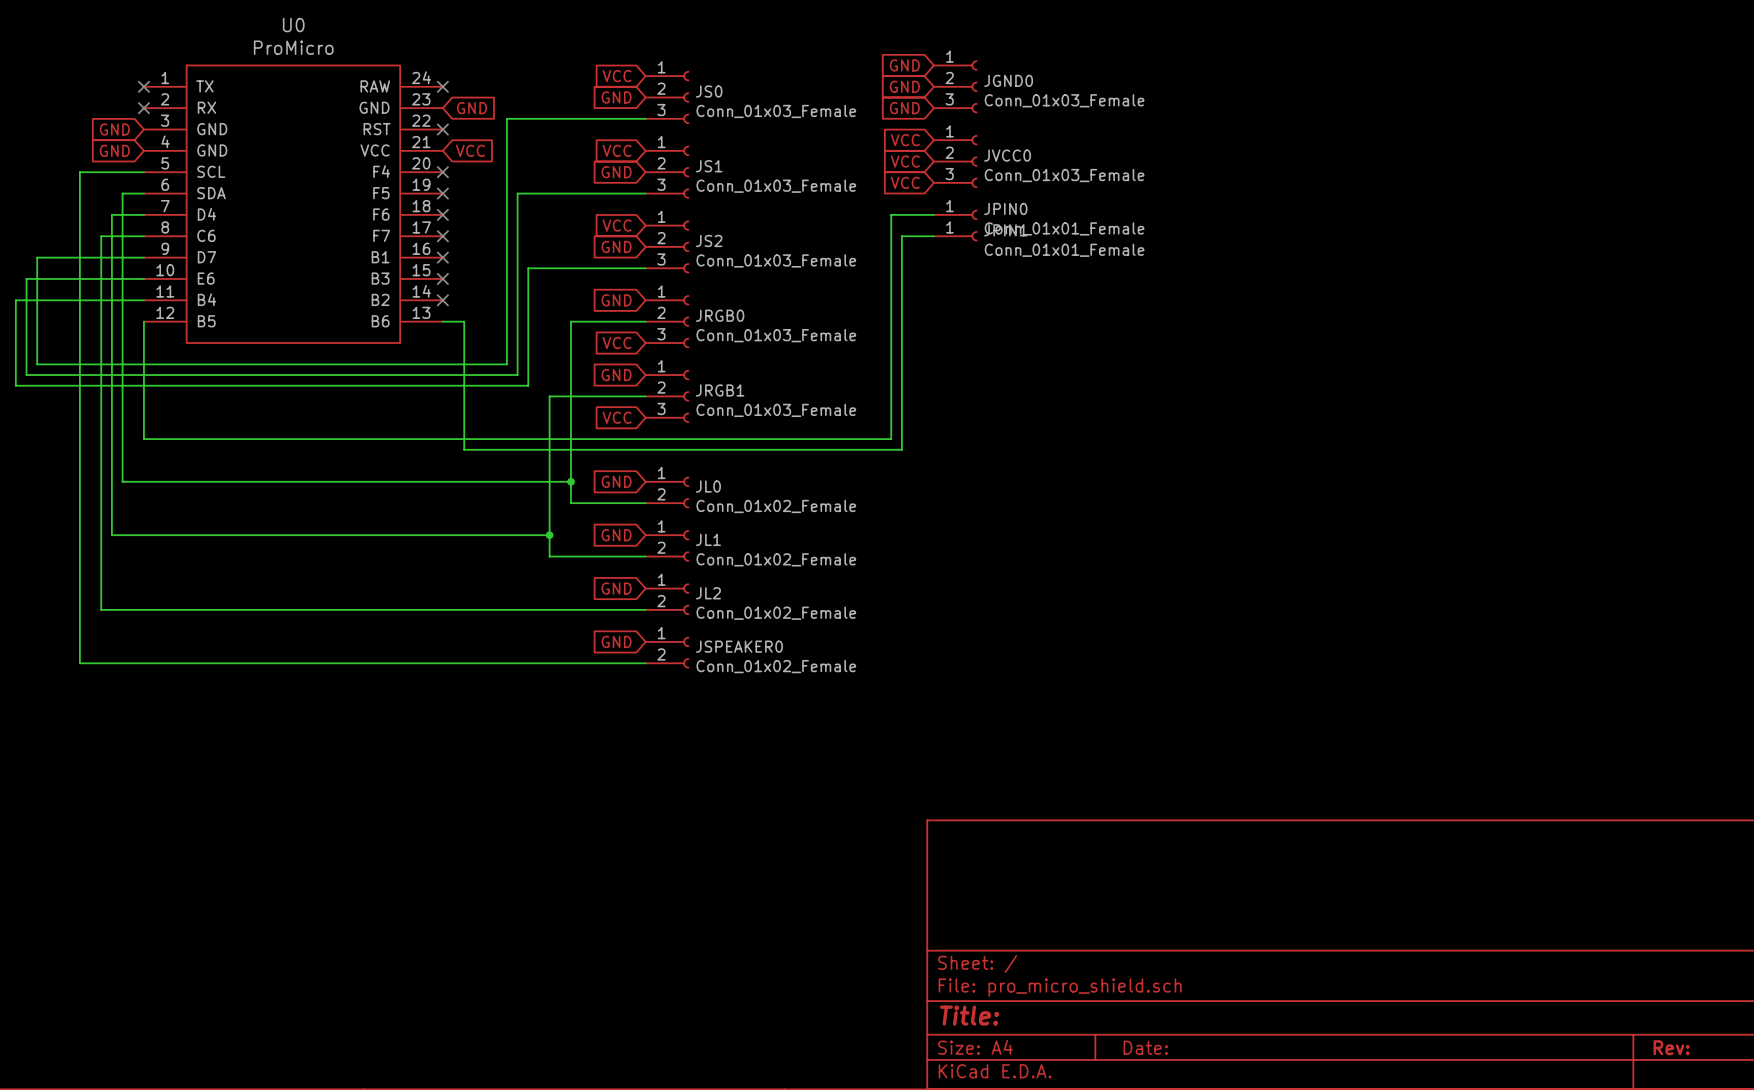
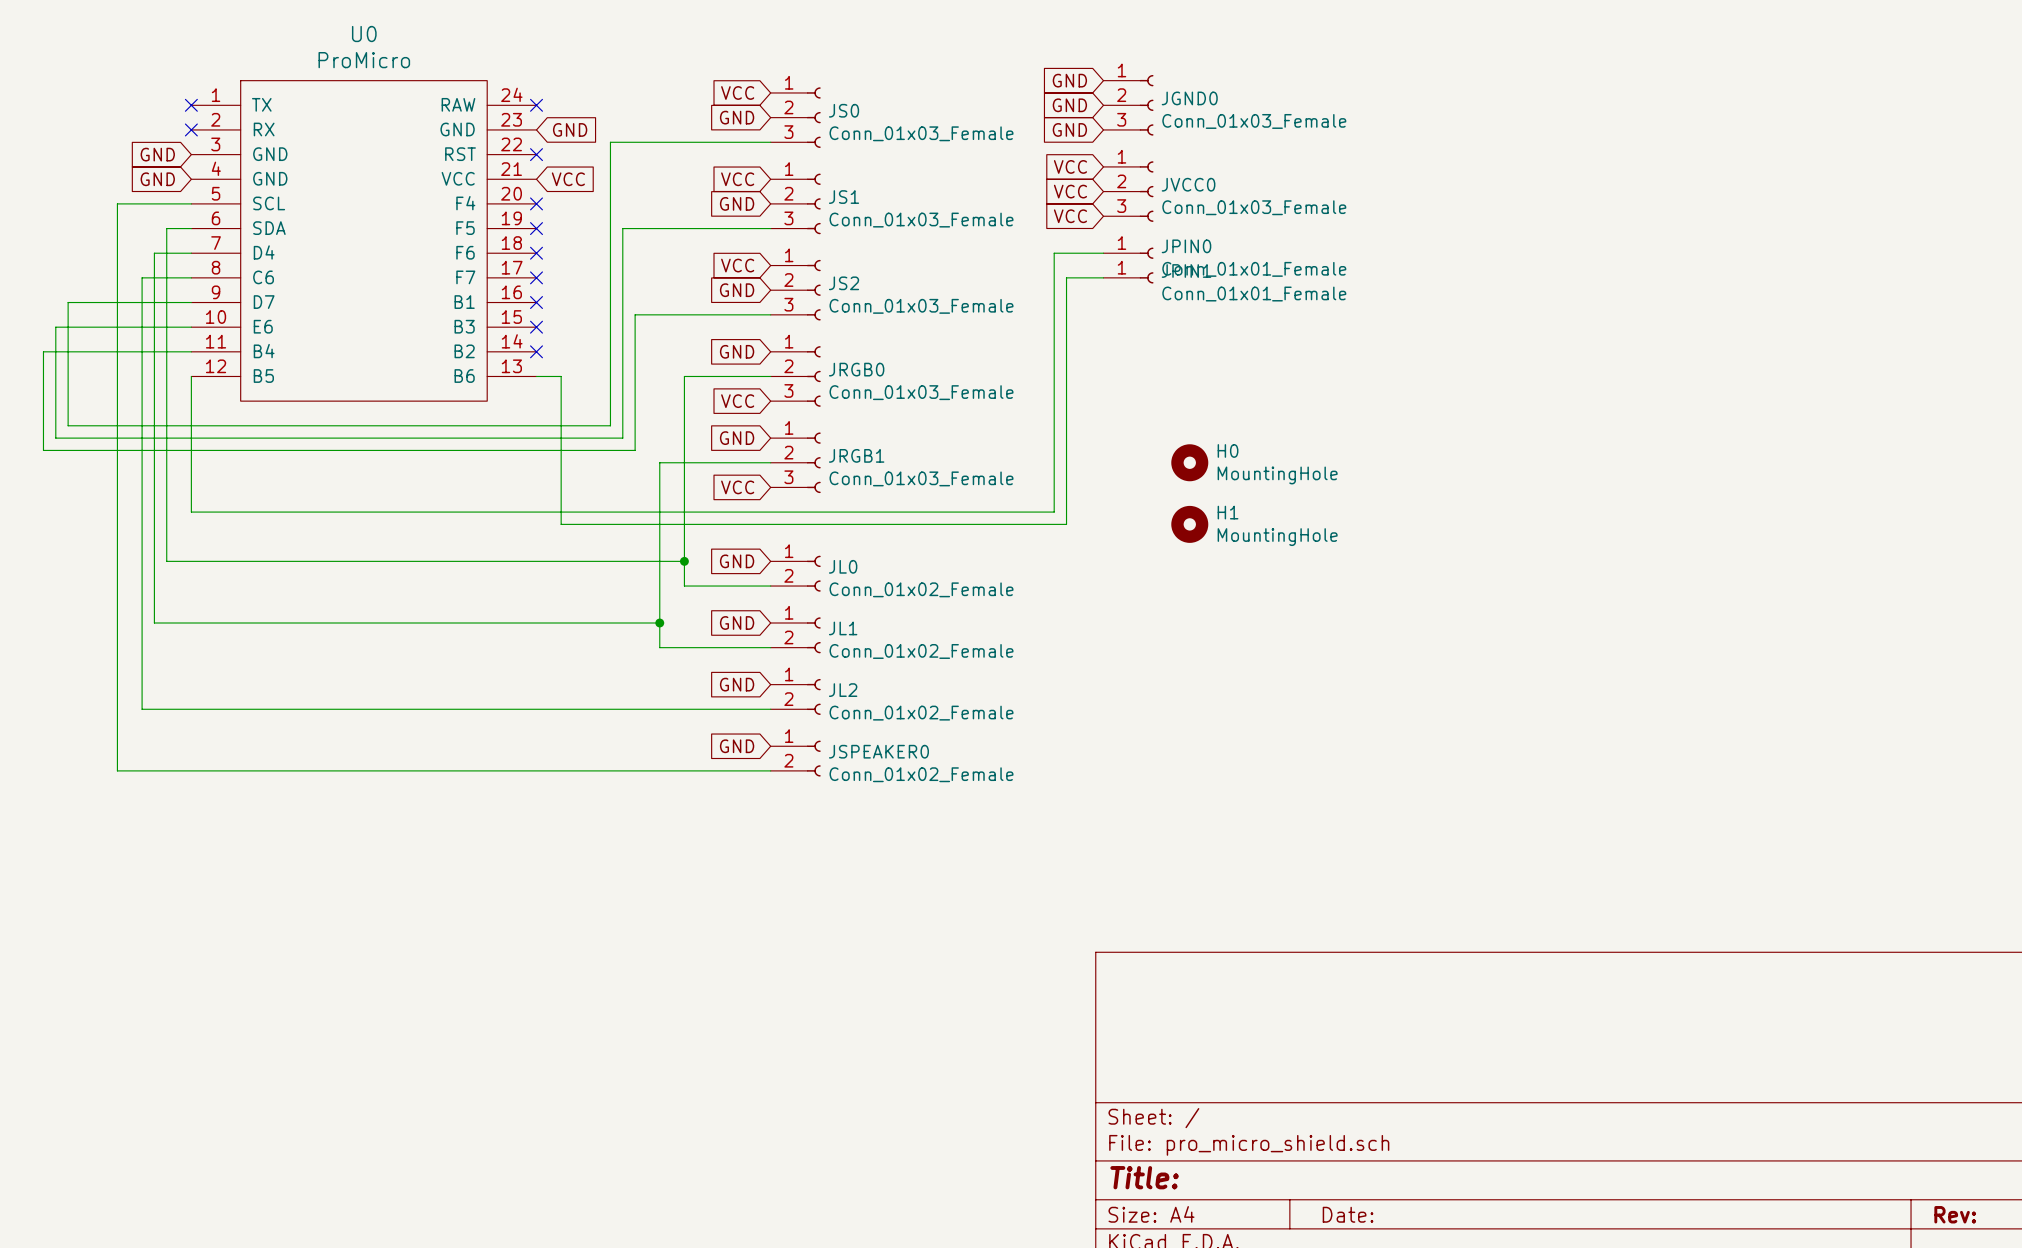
H0: none -> MountingHole (1189, 462)
H1: none -> MountingHole (1189, 524)

